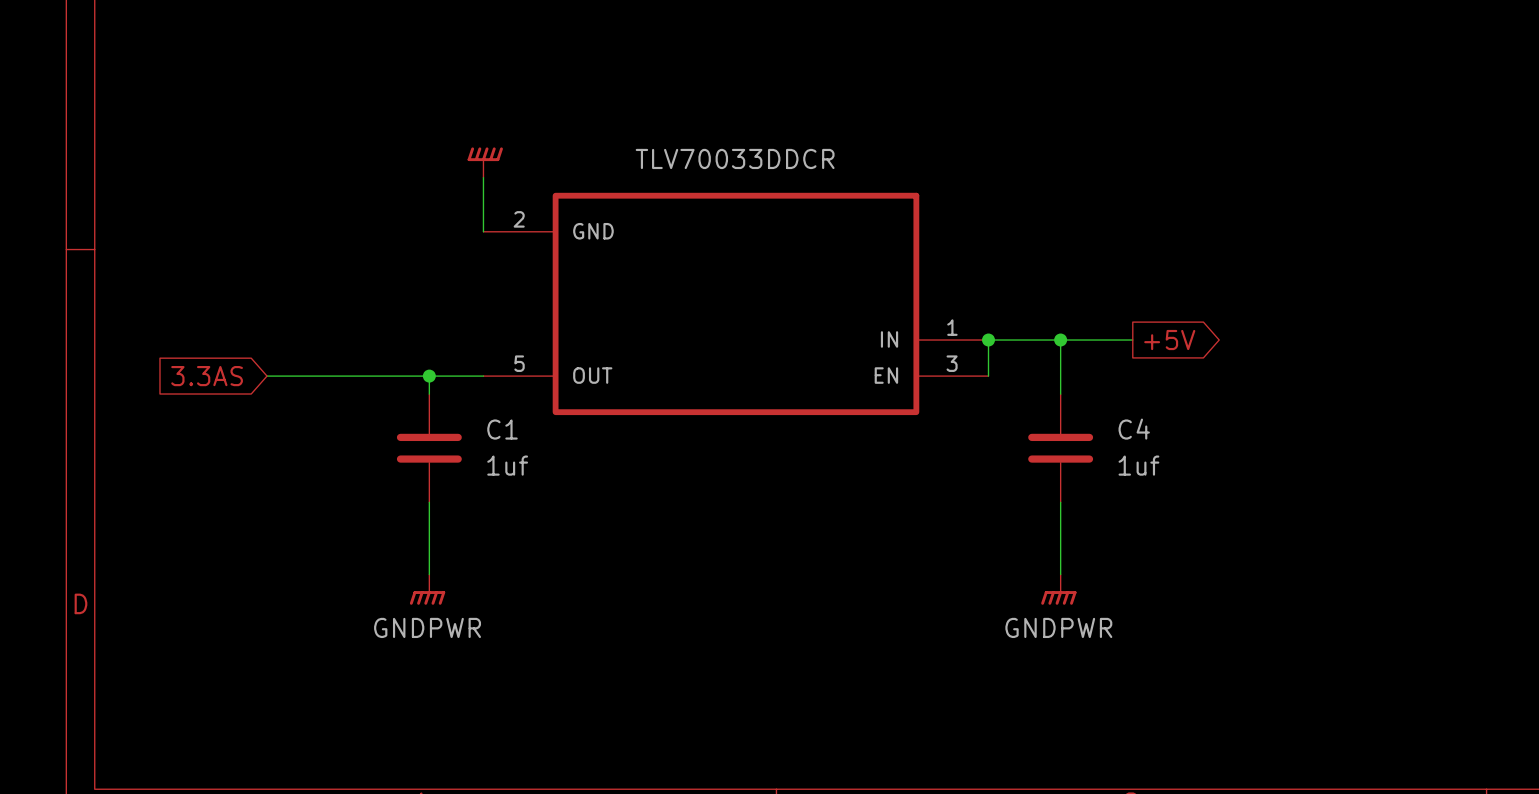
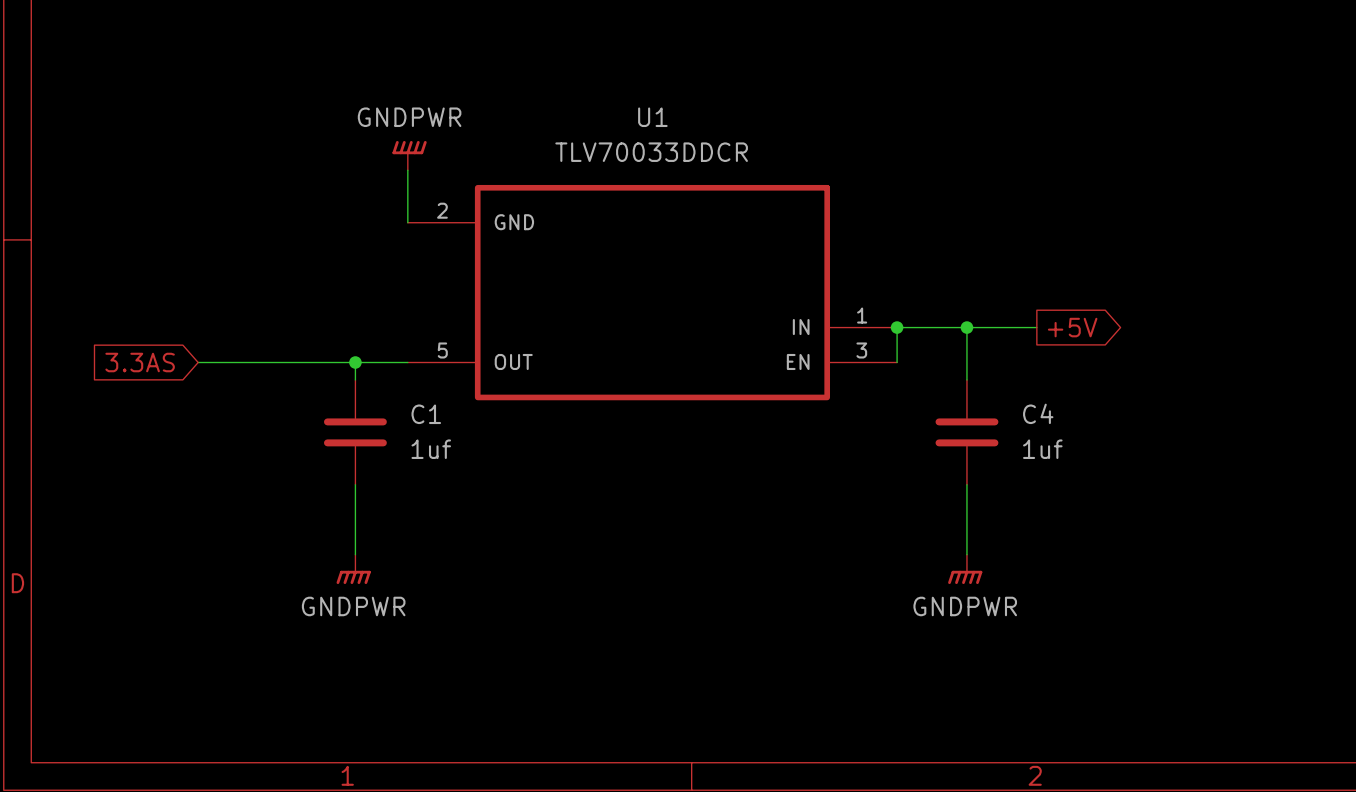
power symbol text: none -> GNDPWR (409, 117)
U1 name: none -> U1 (652, 117)

